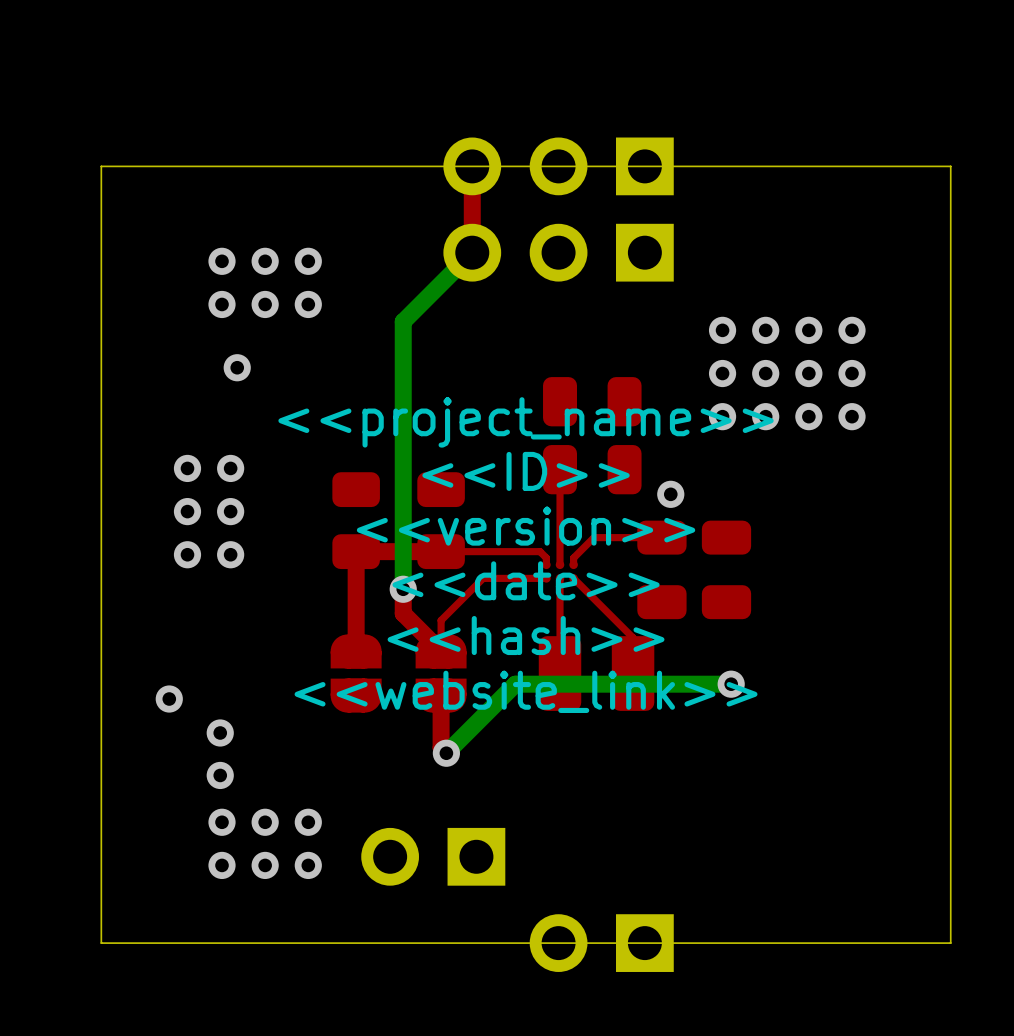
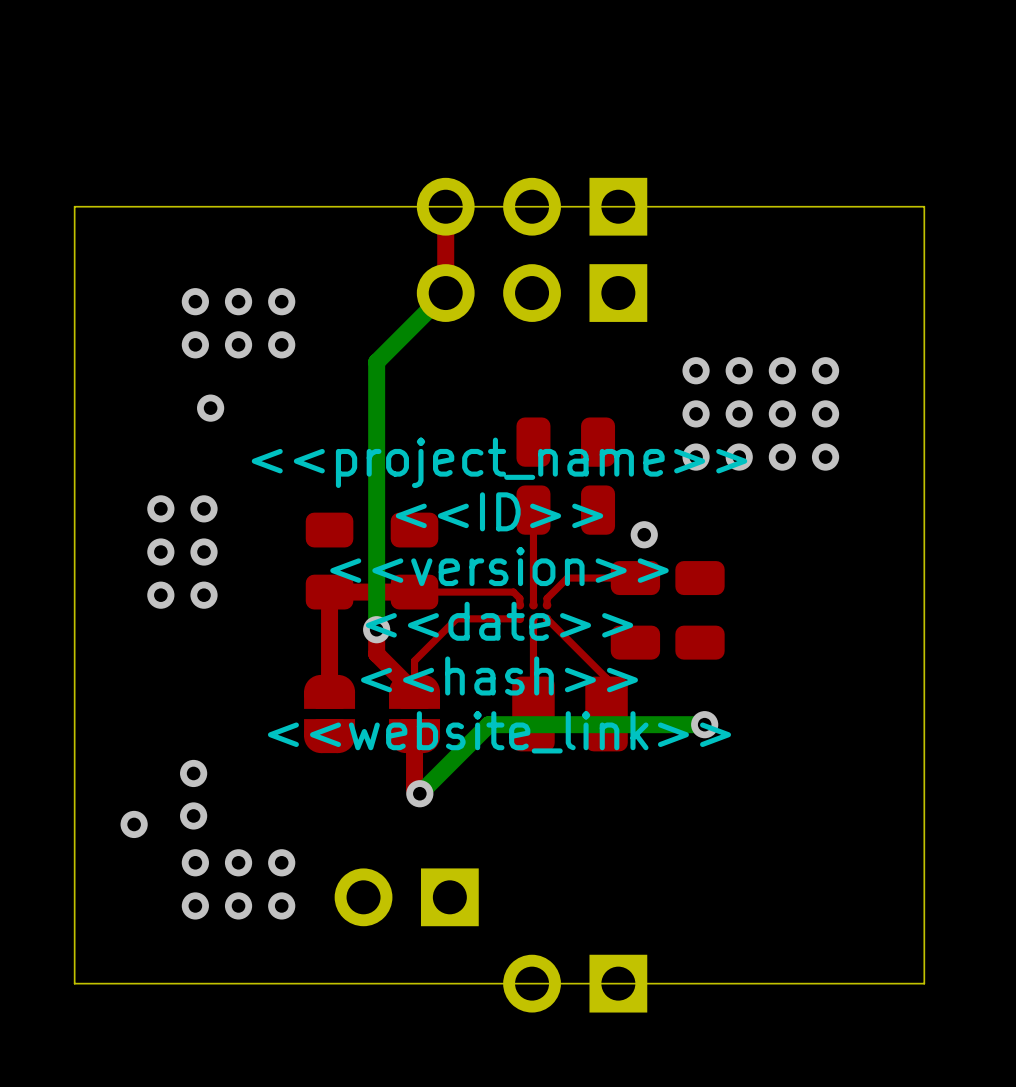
via position: (169, 699) -> (134, 824)

